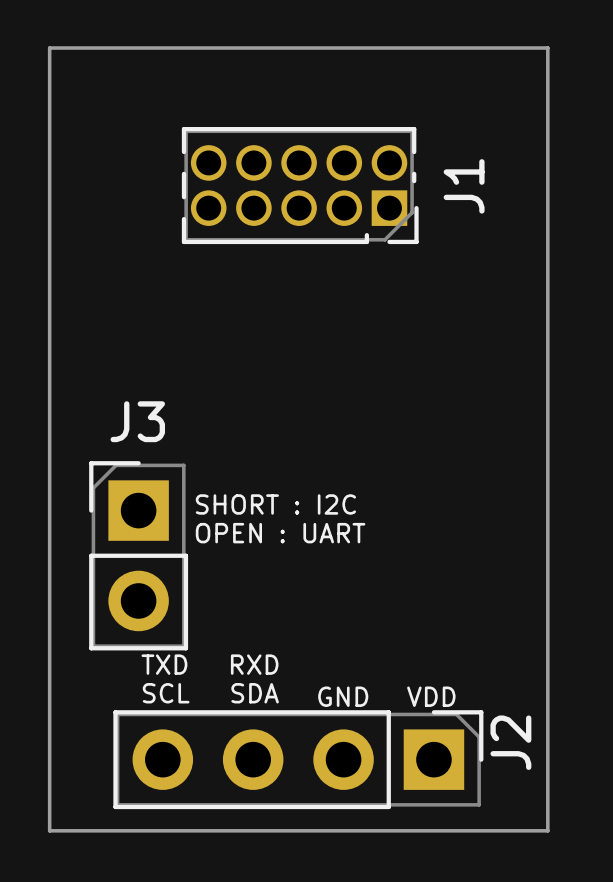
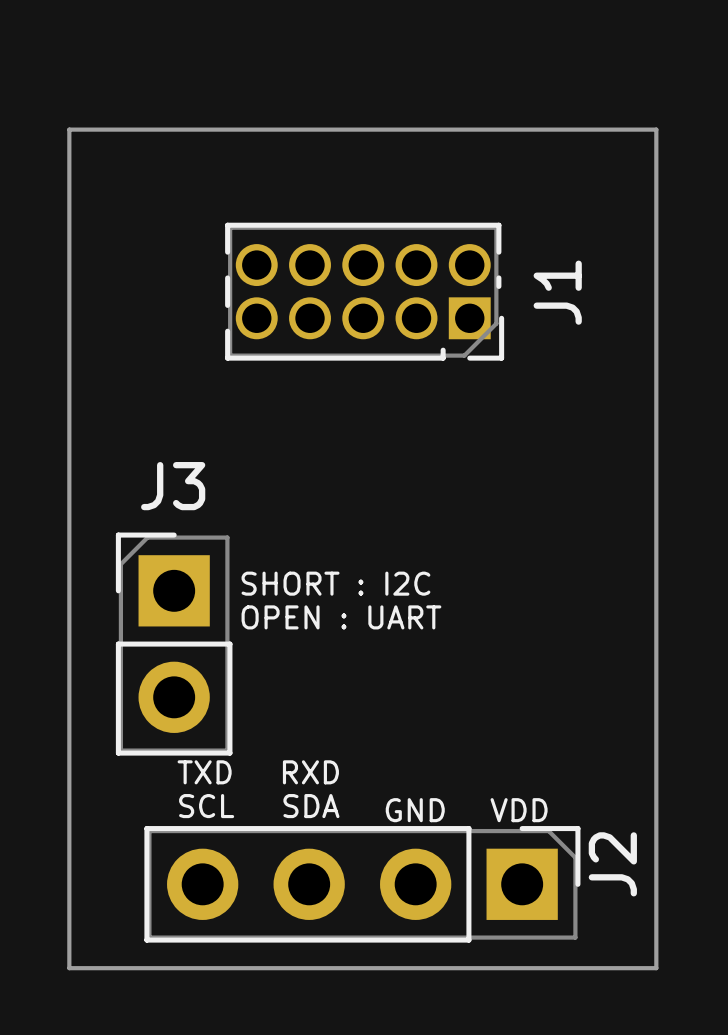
board edge: (49, 119) (49, 48) (547, 48) (547, 119) -> (69, 129) (656, 129)
J1 position: (300, 185) -> (364, 291)

